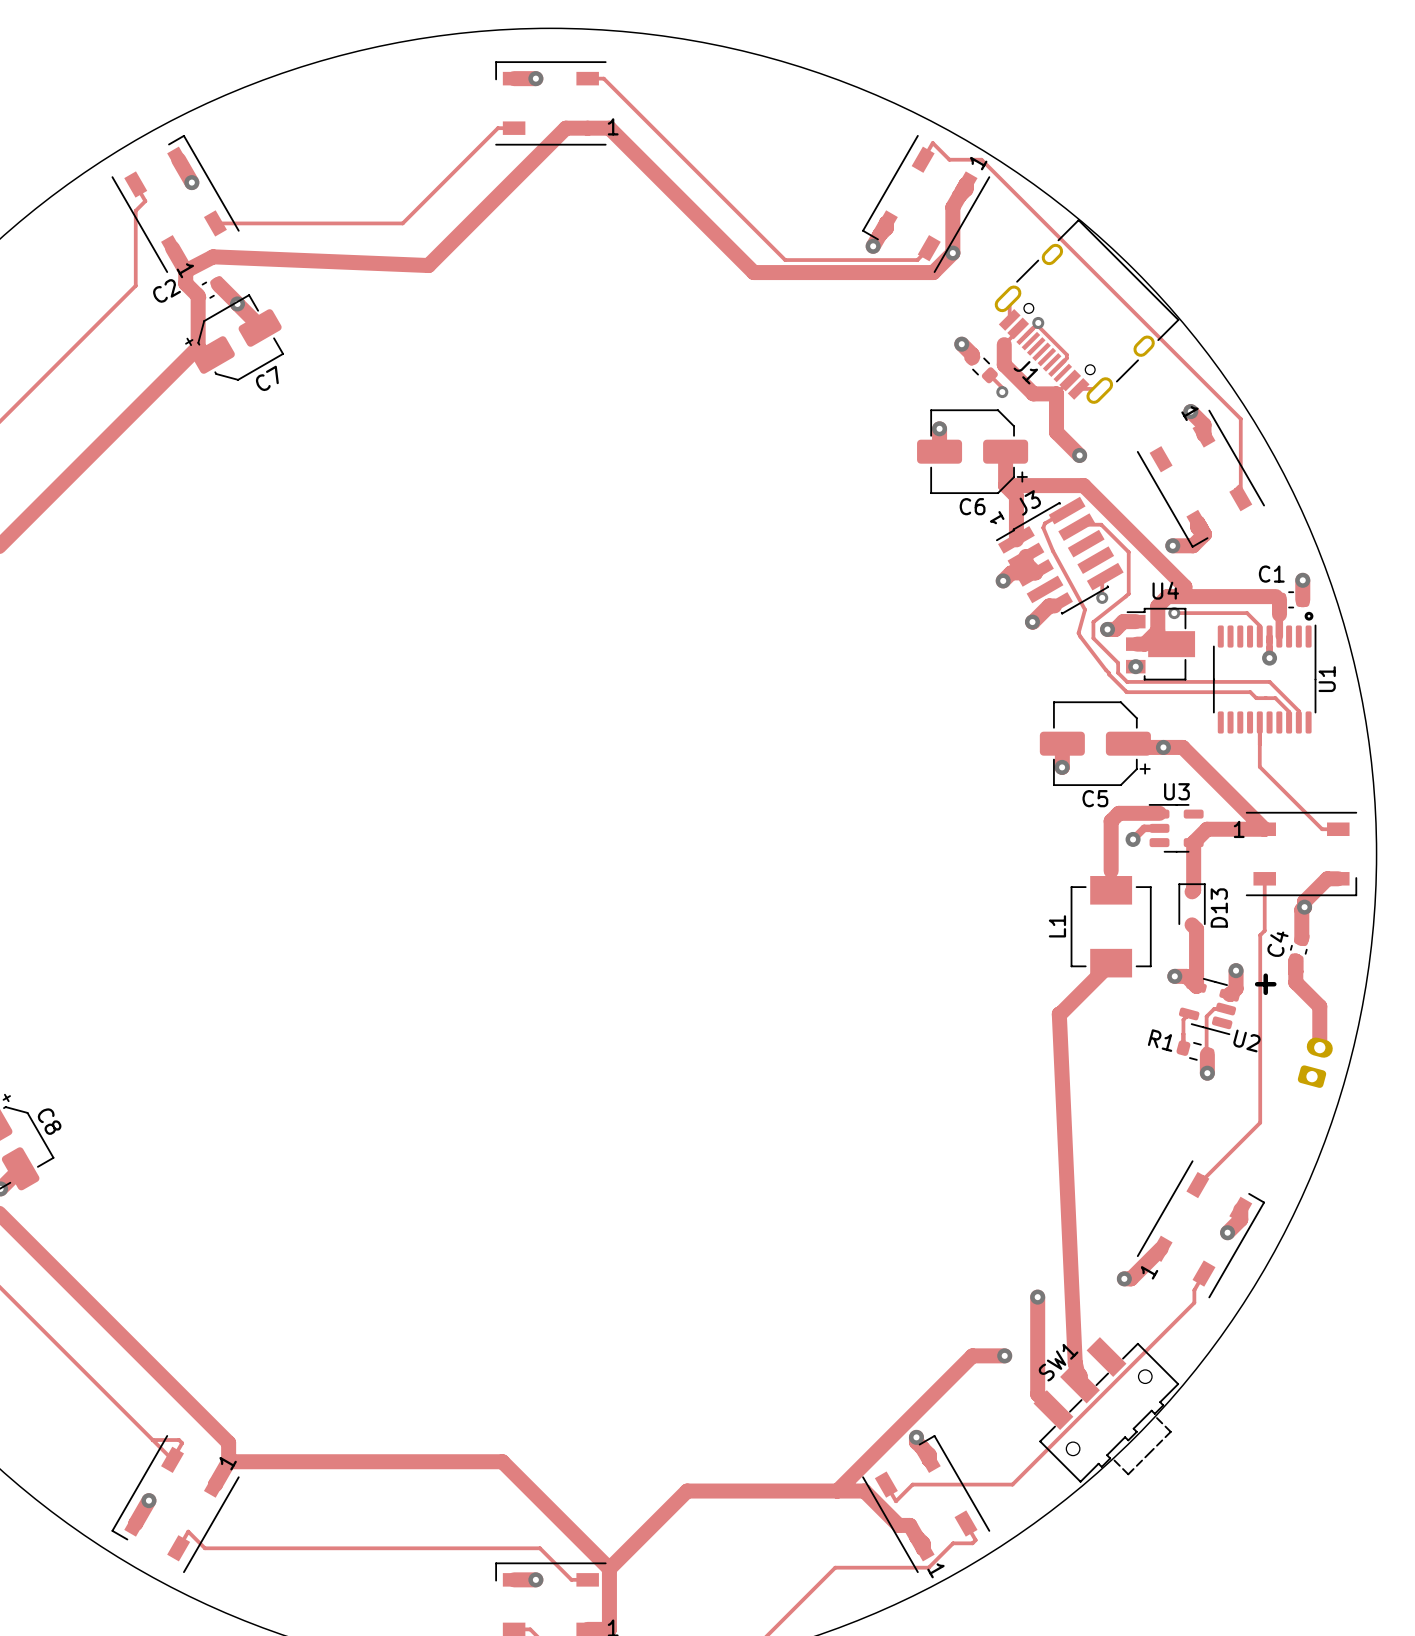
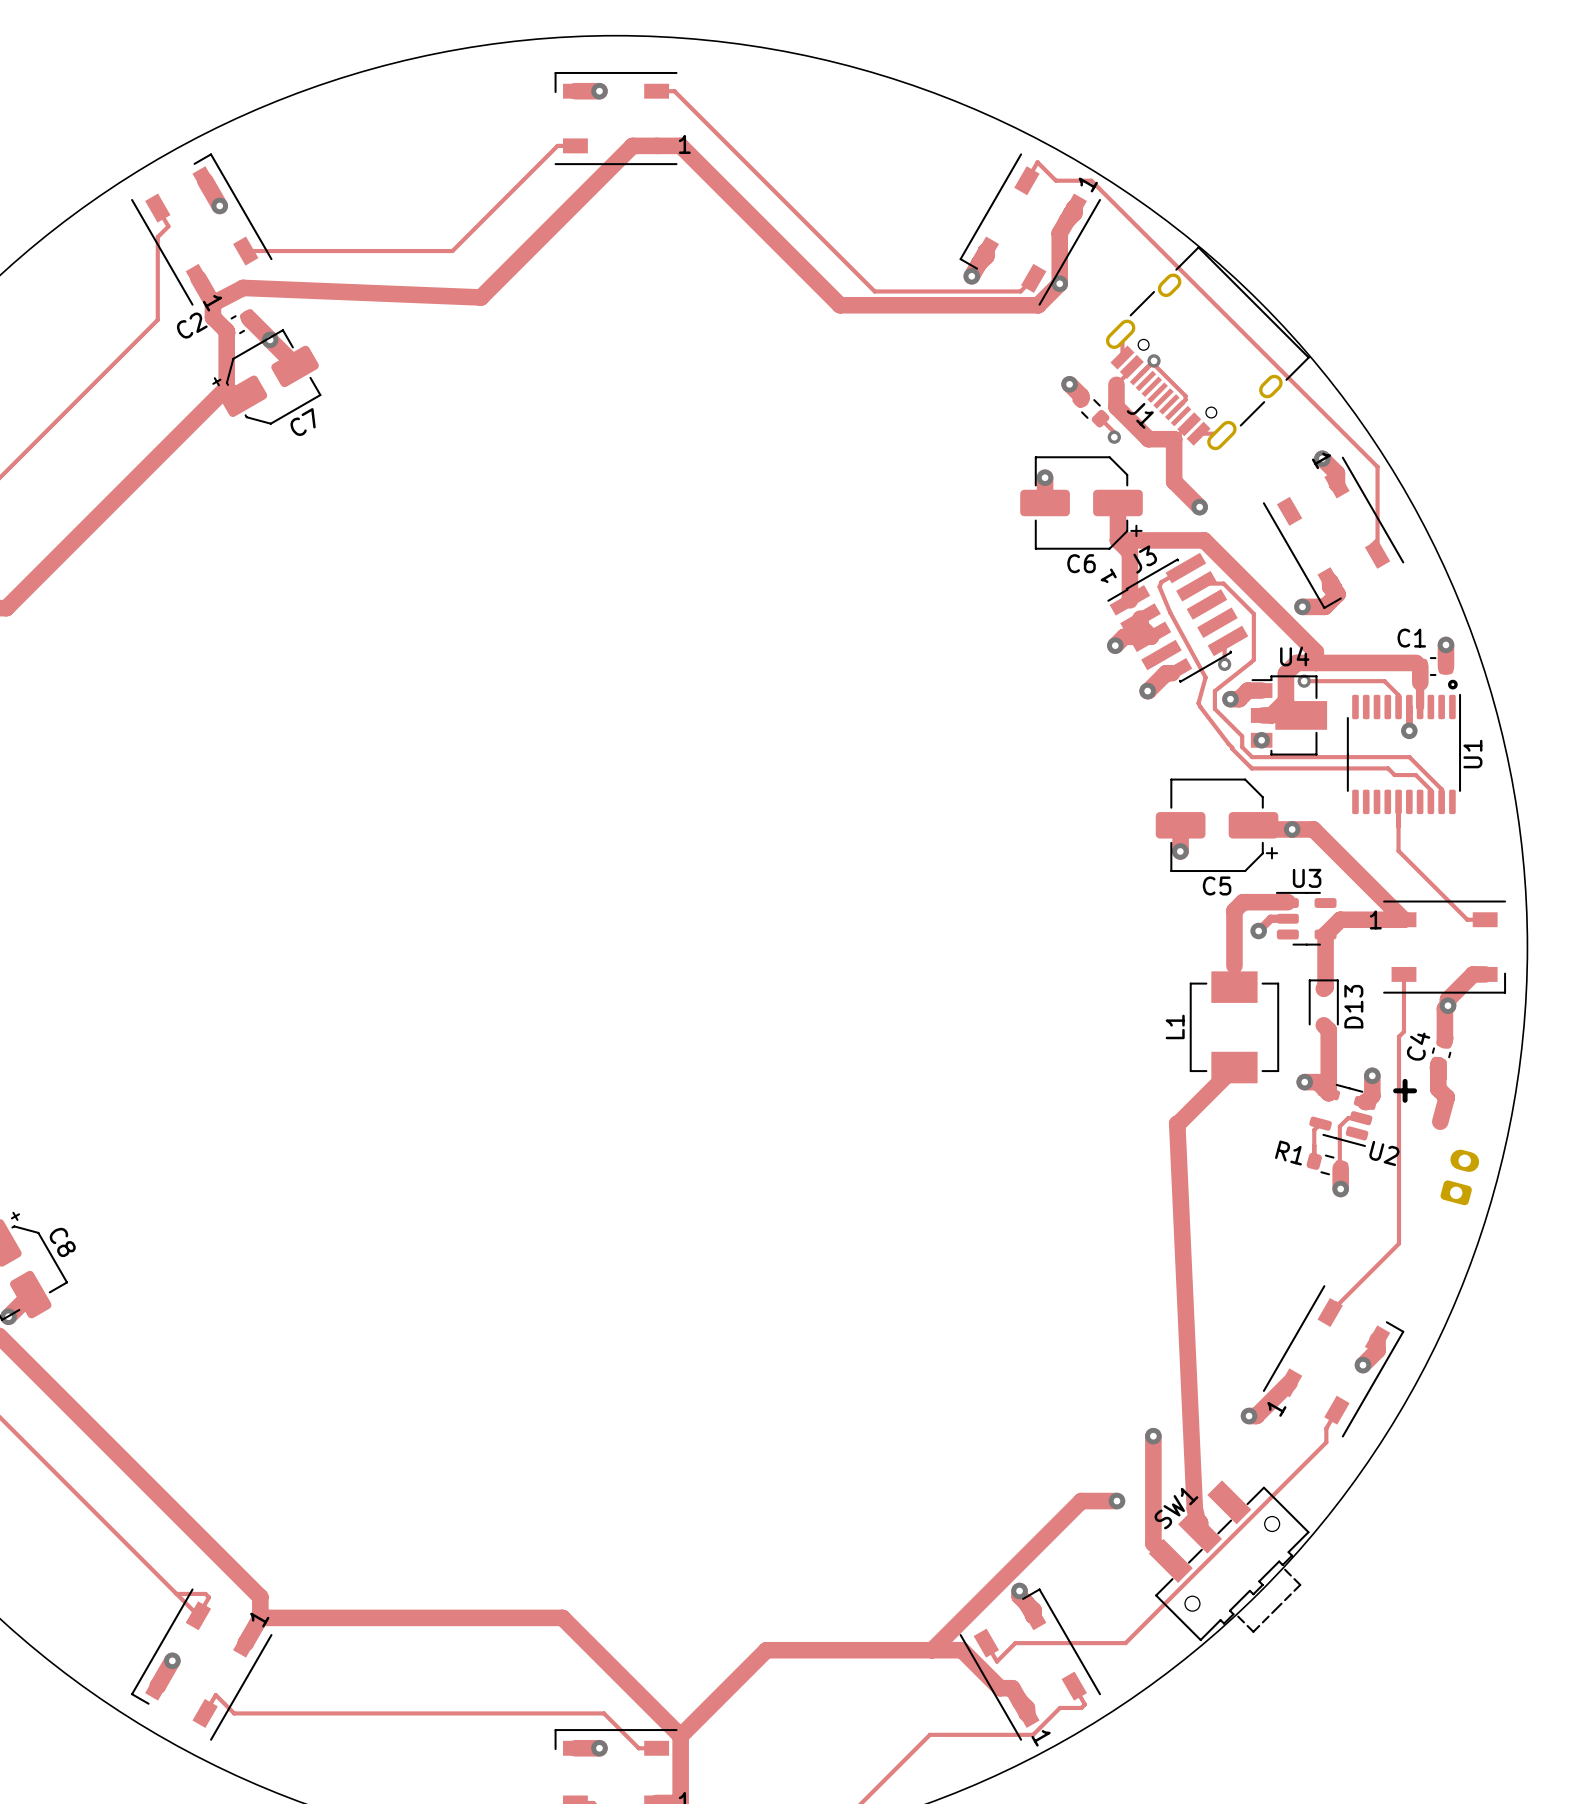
track: (1303, 990) (1319, 1006) (1319, 1047) -> (1446, 1097) (1440, 1121)

